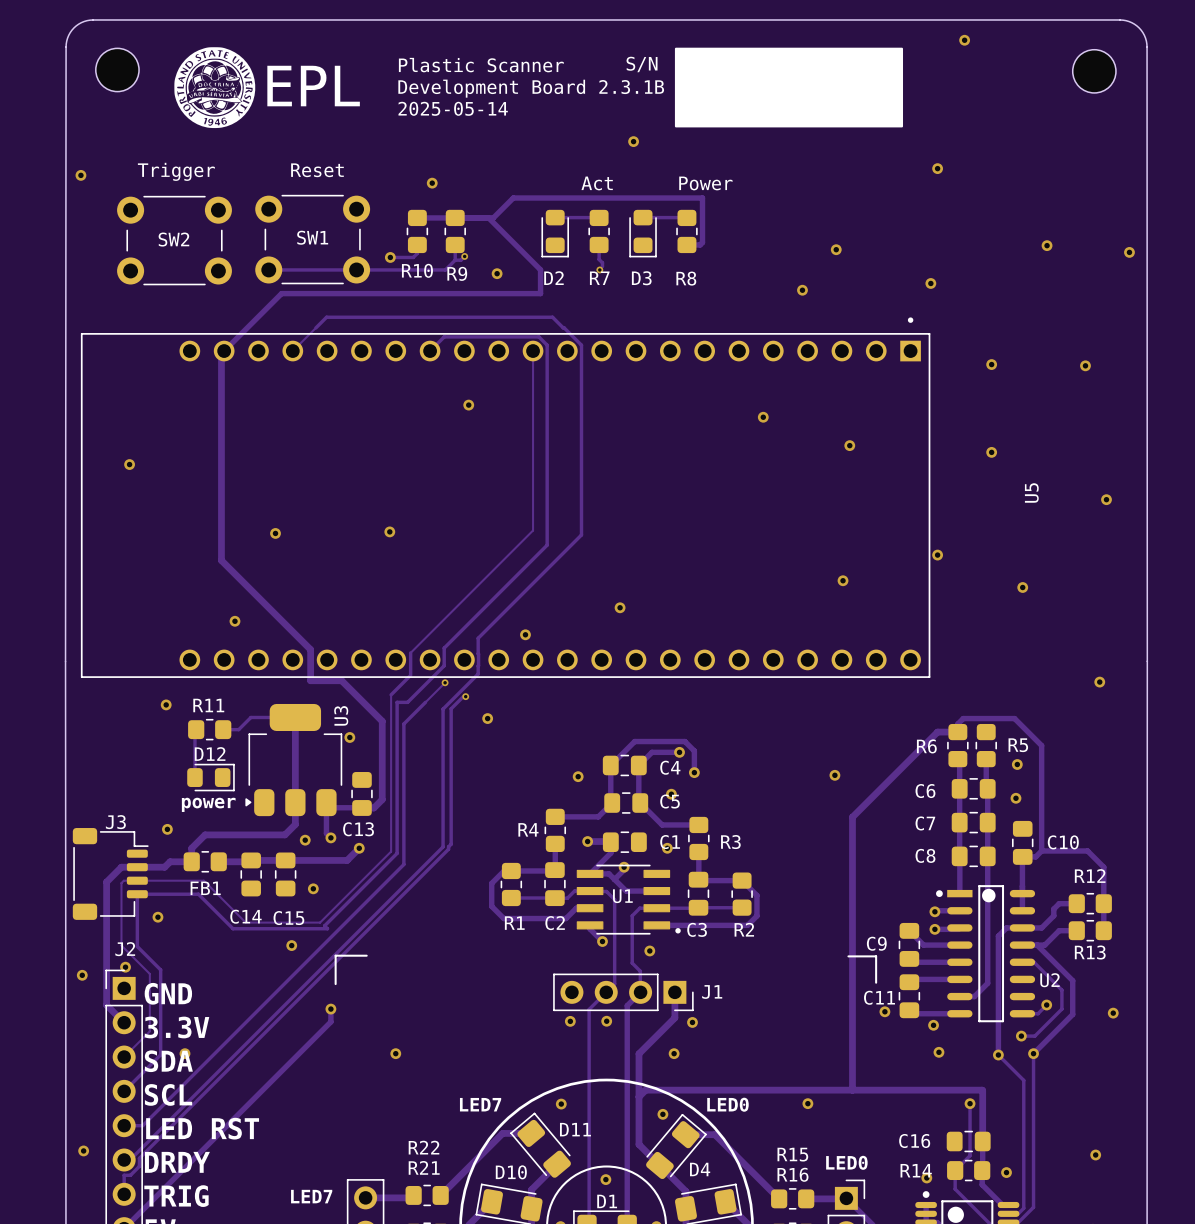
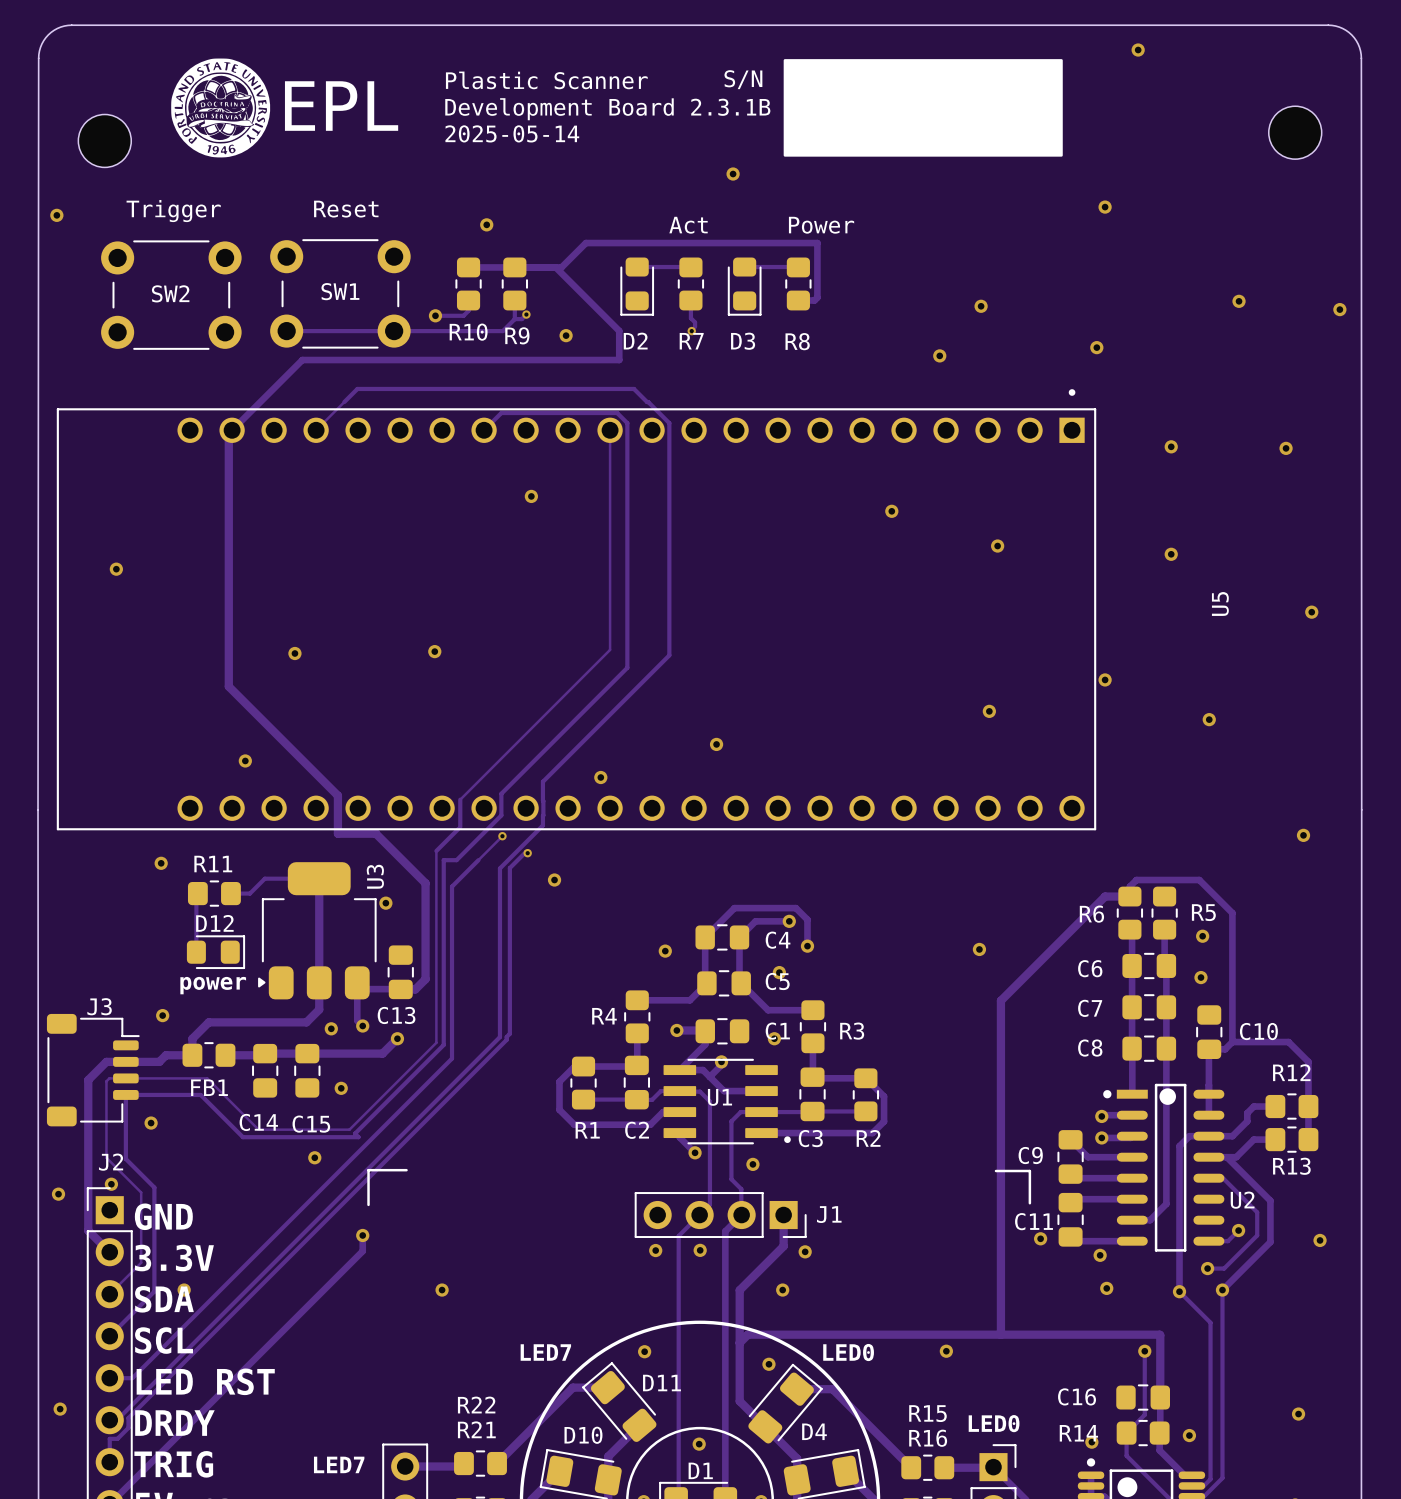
part position: (117, 69) -> (104, 140)
part position: (1094, 71) -> (1295, 132)

